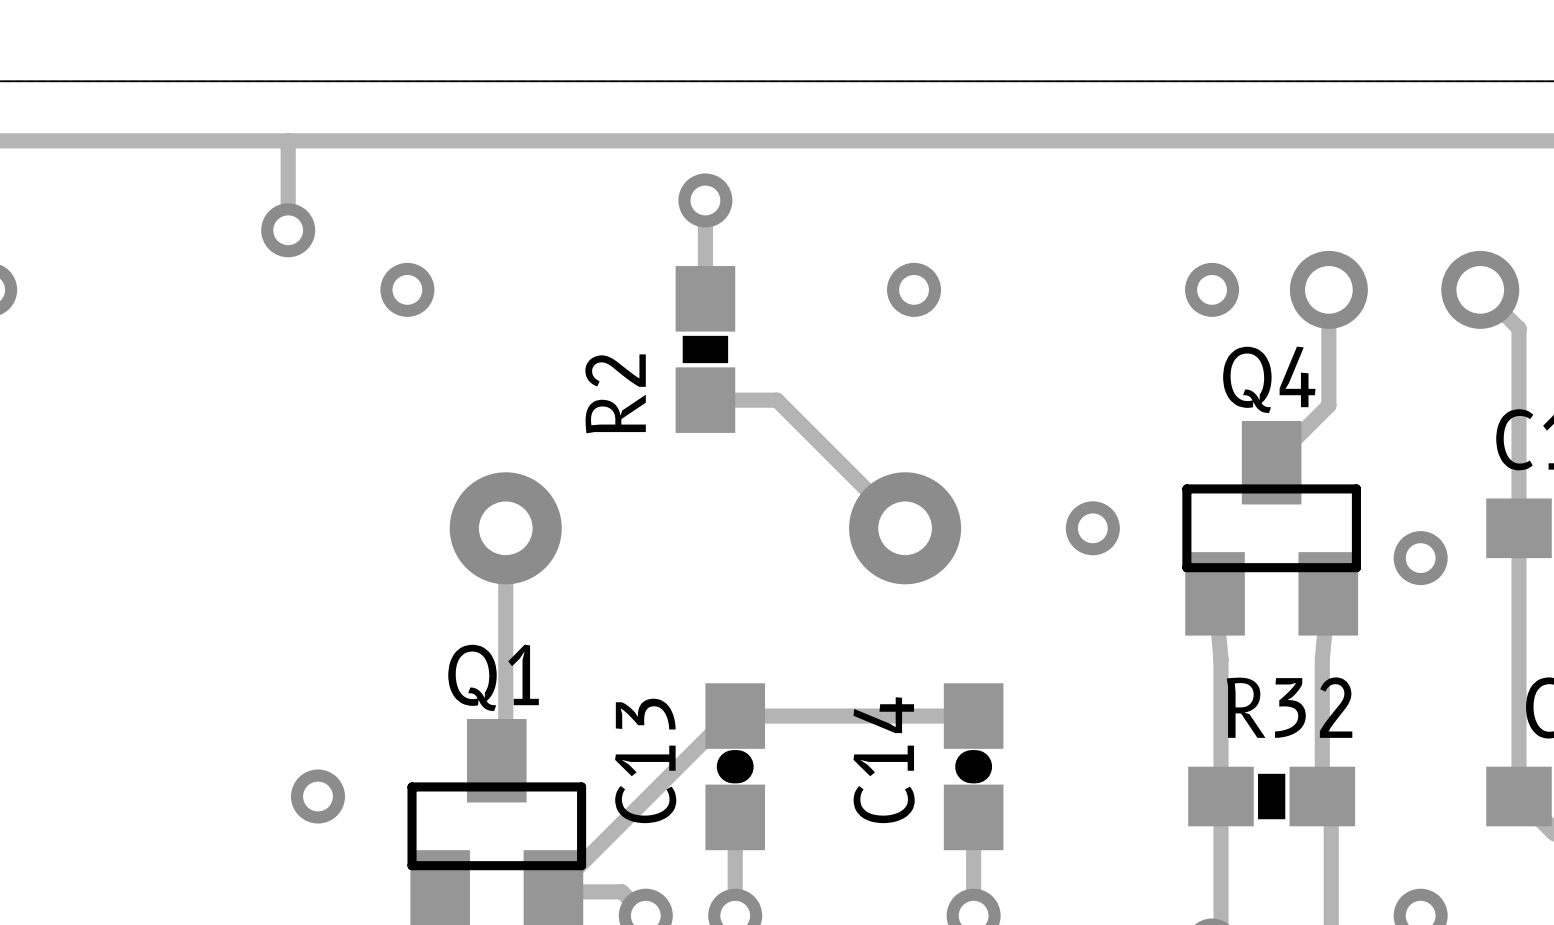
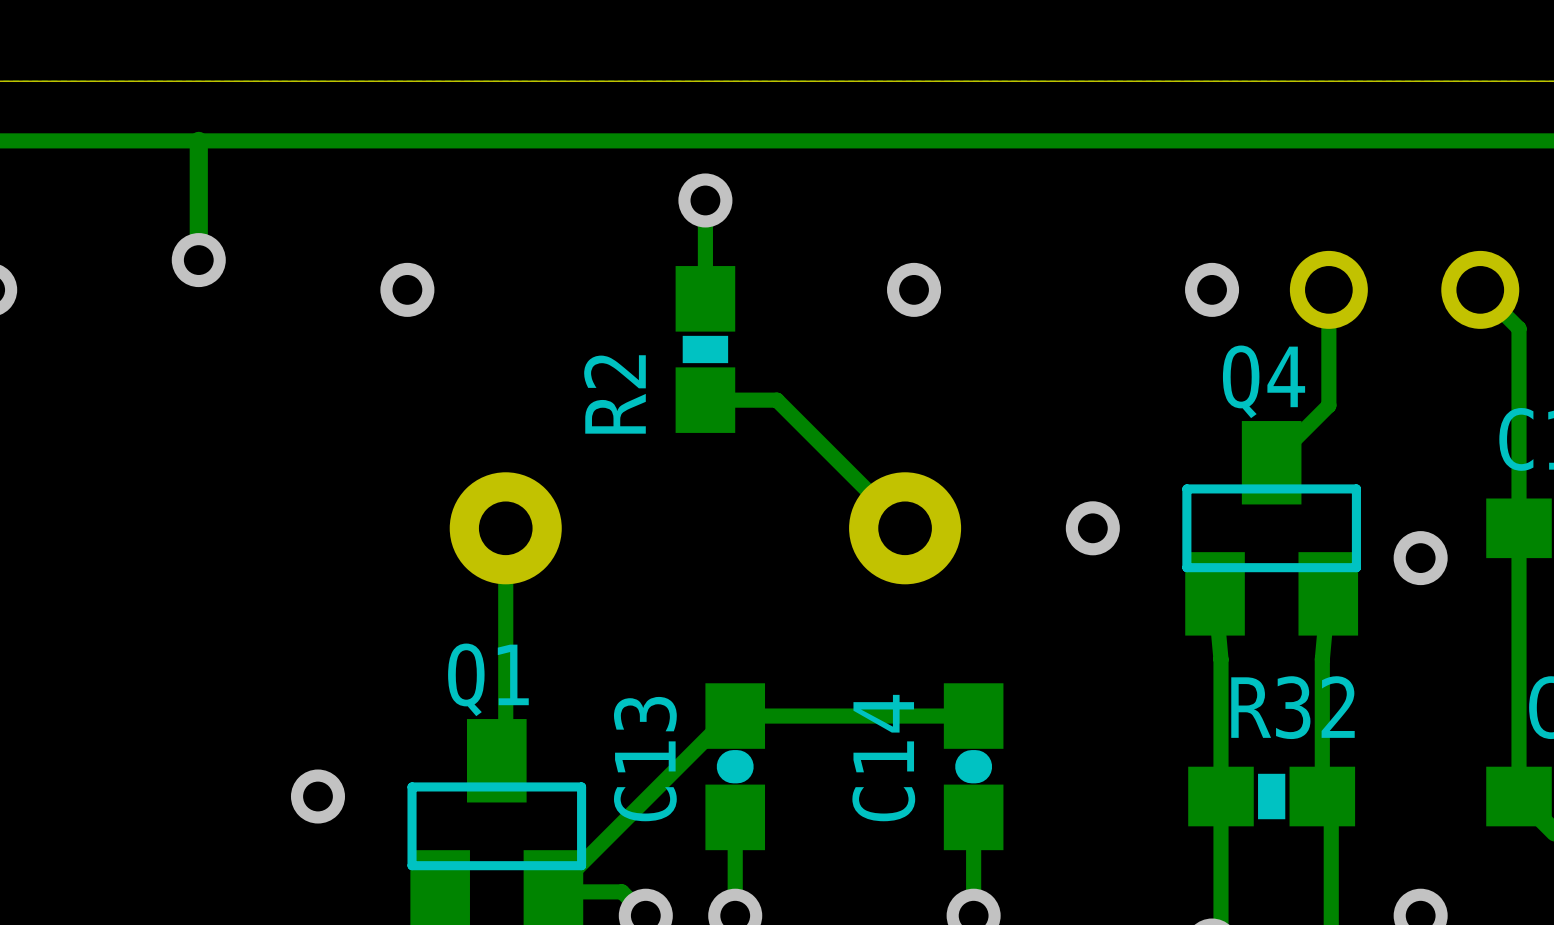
track: none -> (198, 140) (198, 260)
track: (288, 140) (288, 230) -> none
via position: (288, 230) -> (198, 260)

